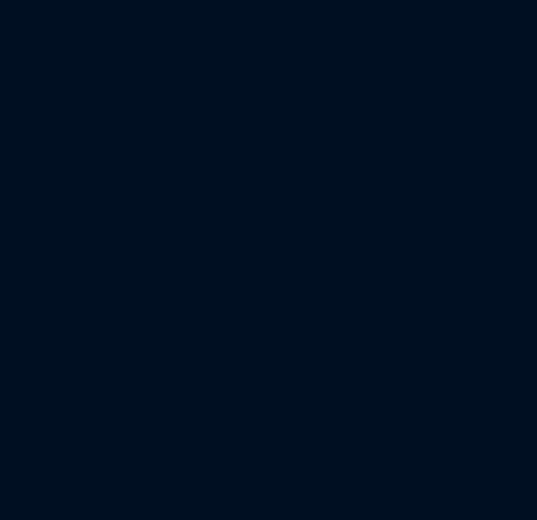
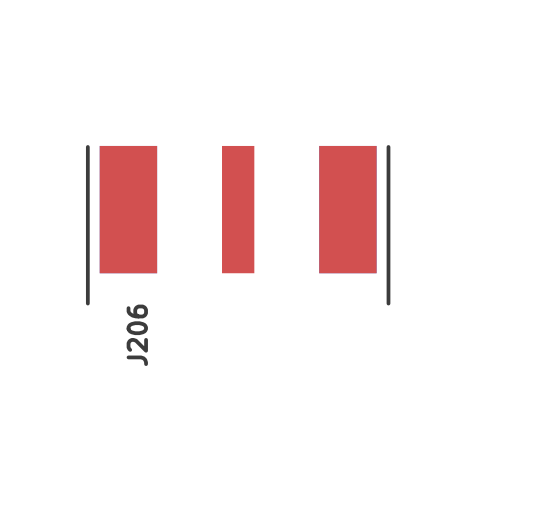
J206: none -> (238, 225)

